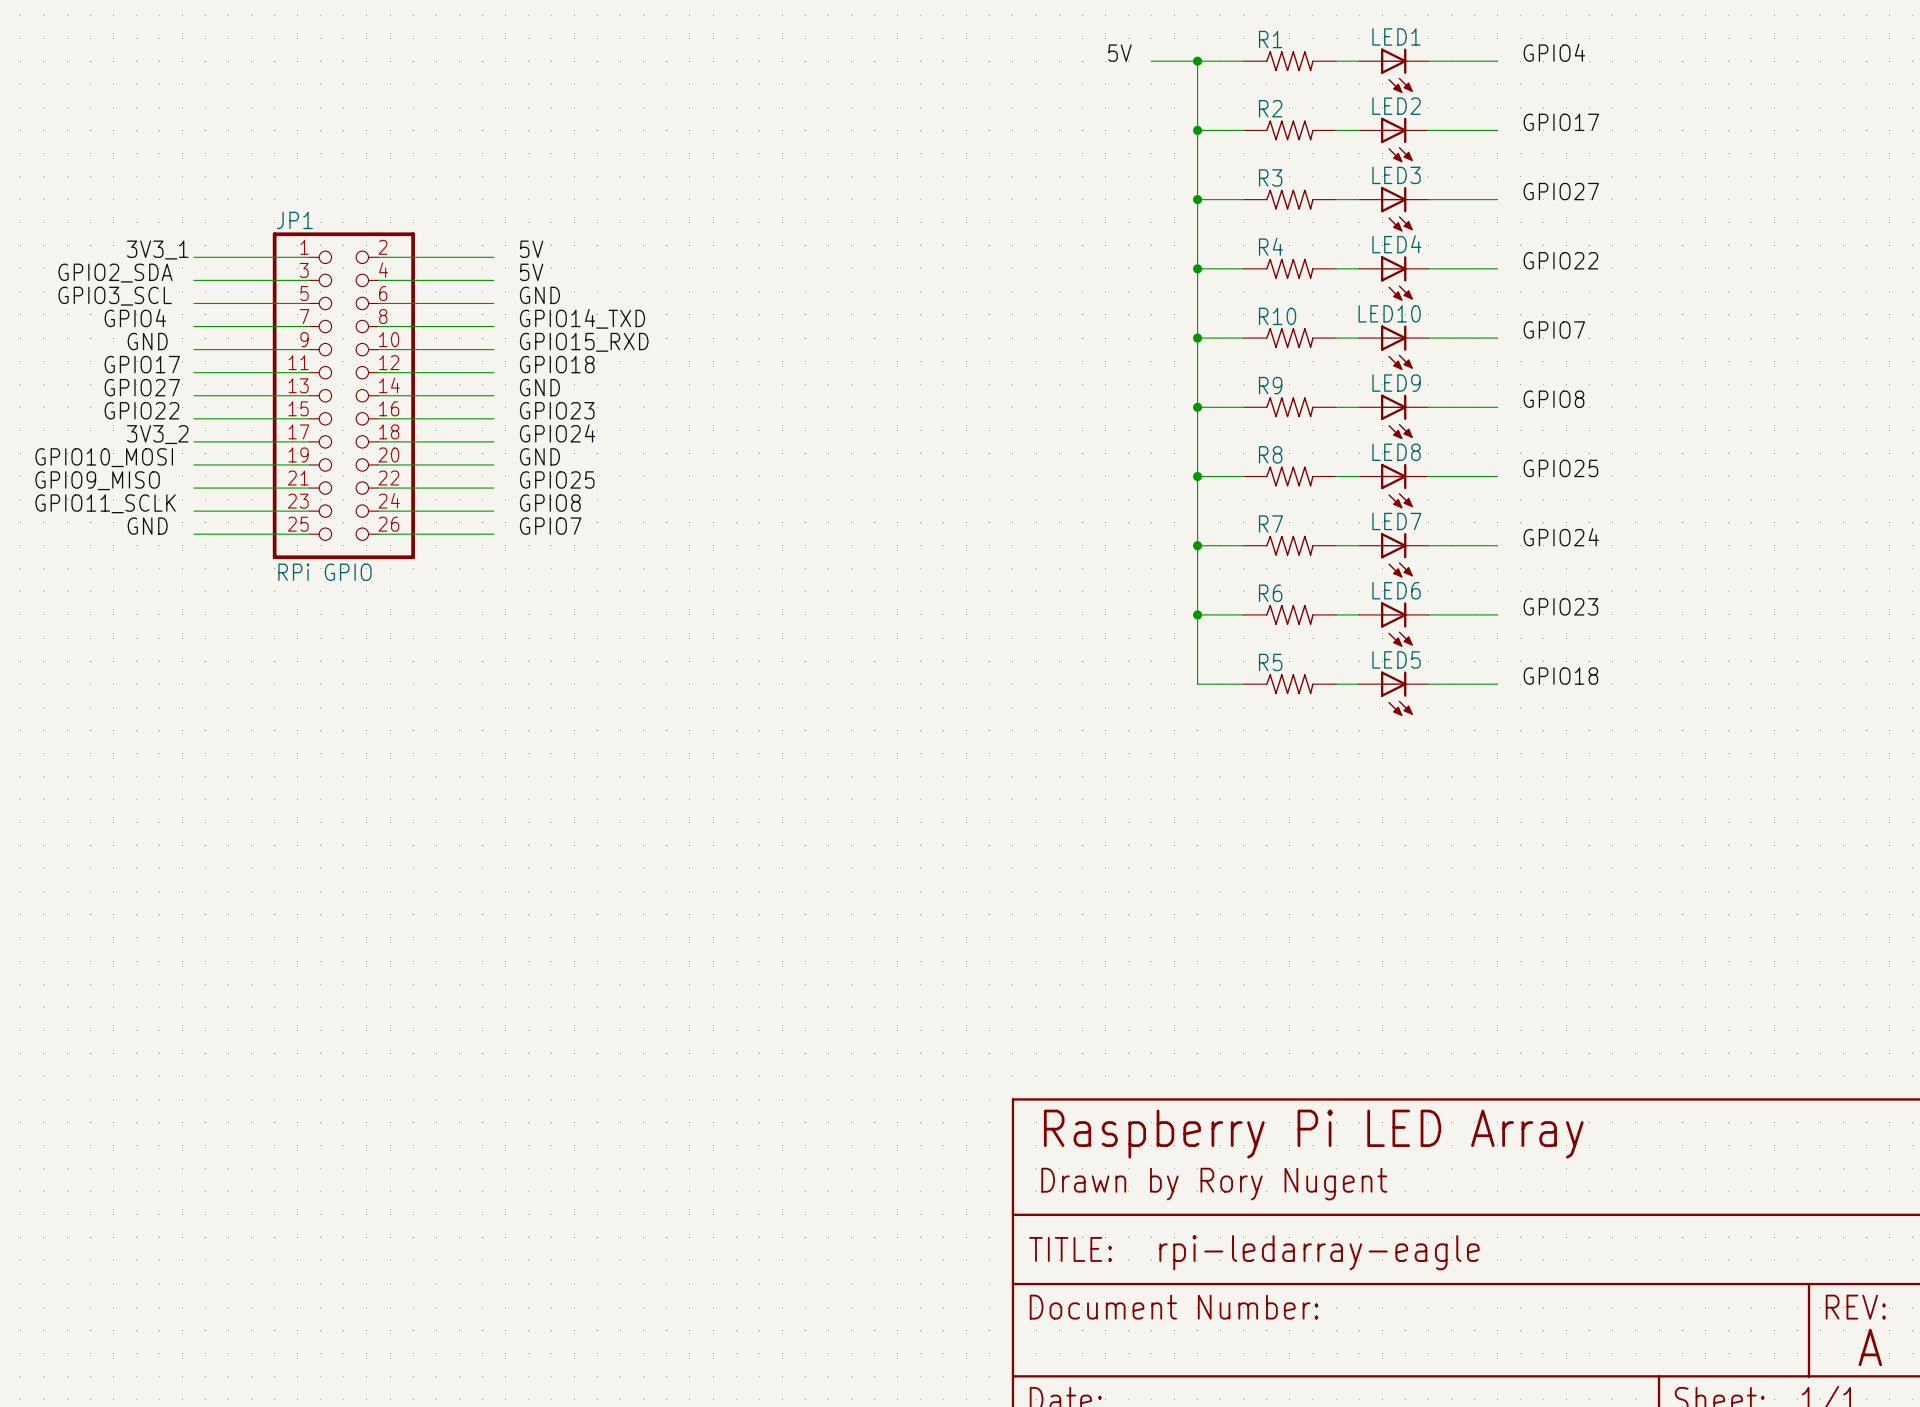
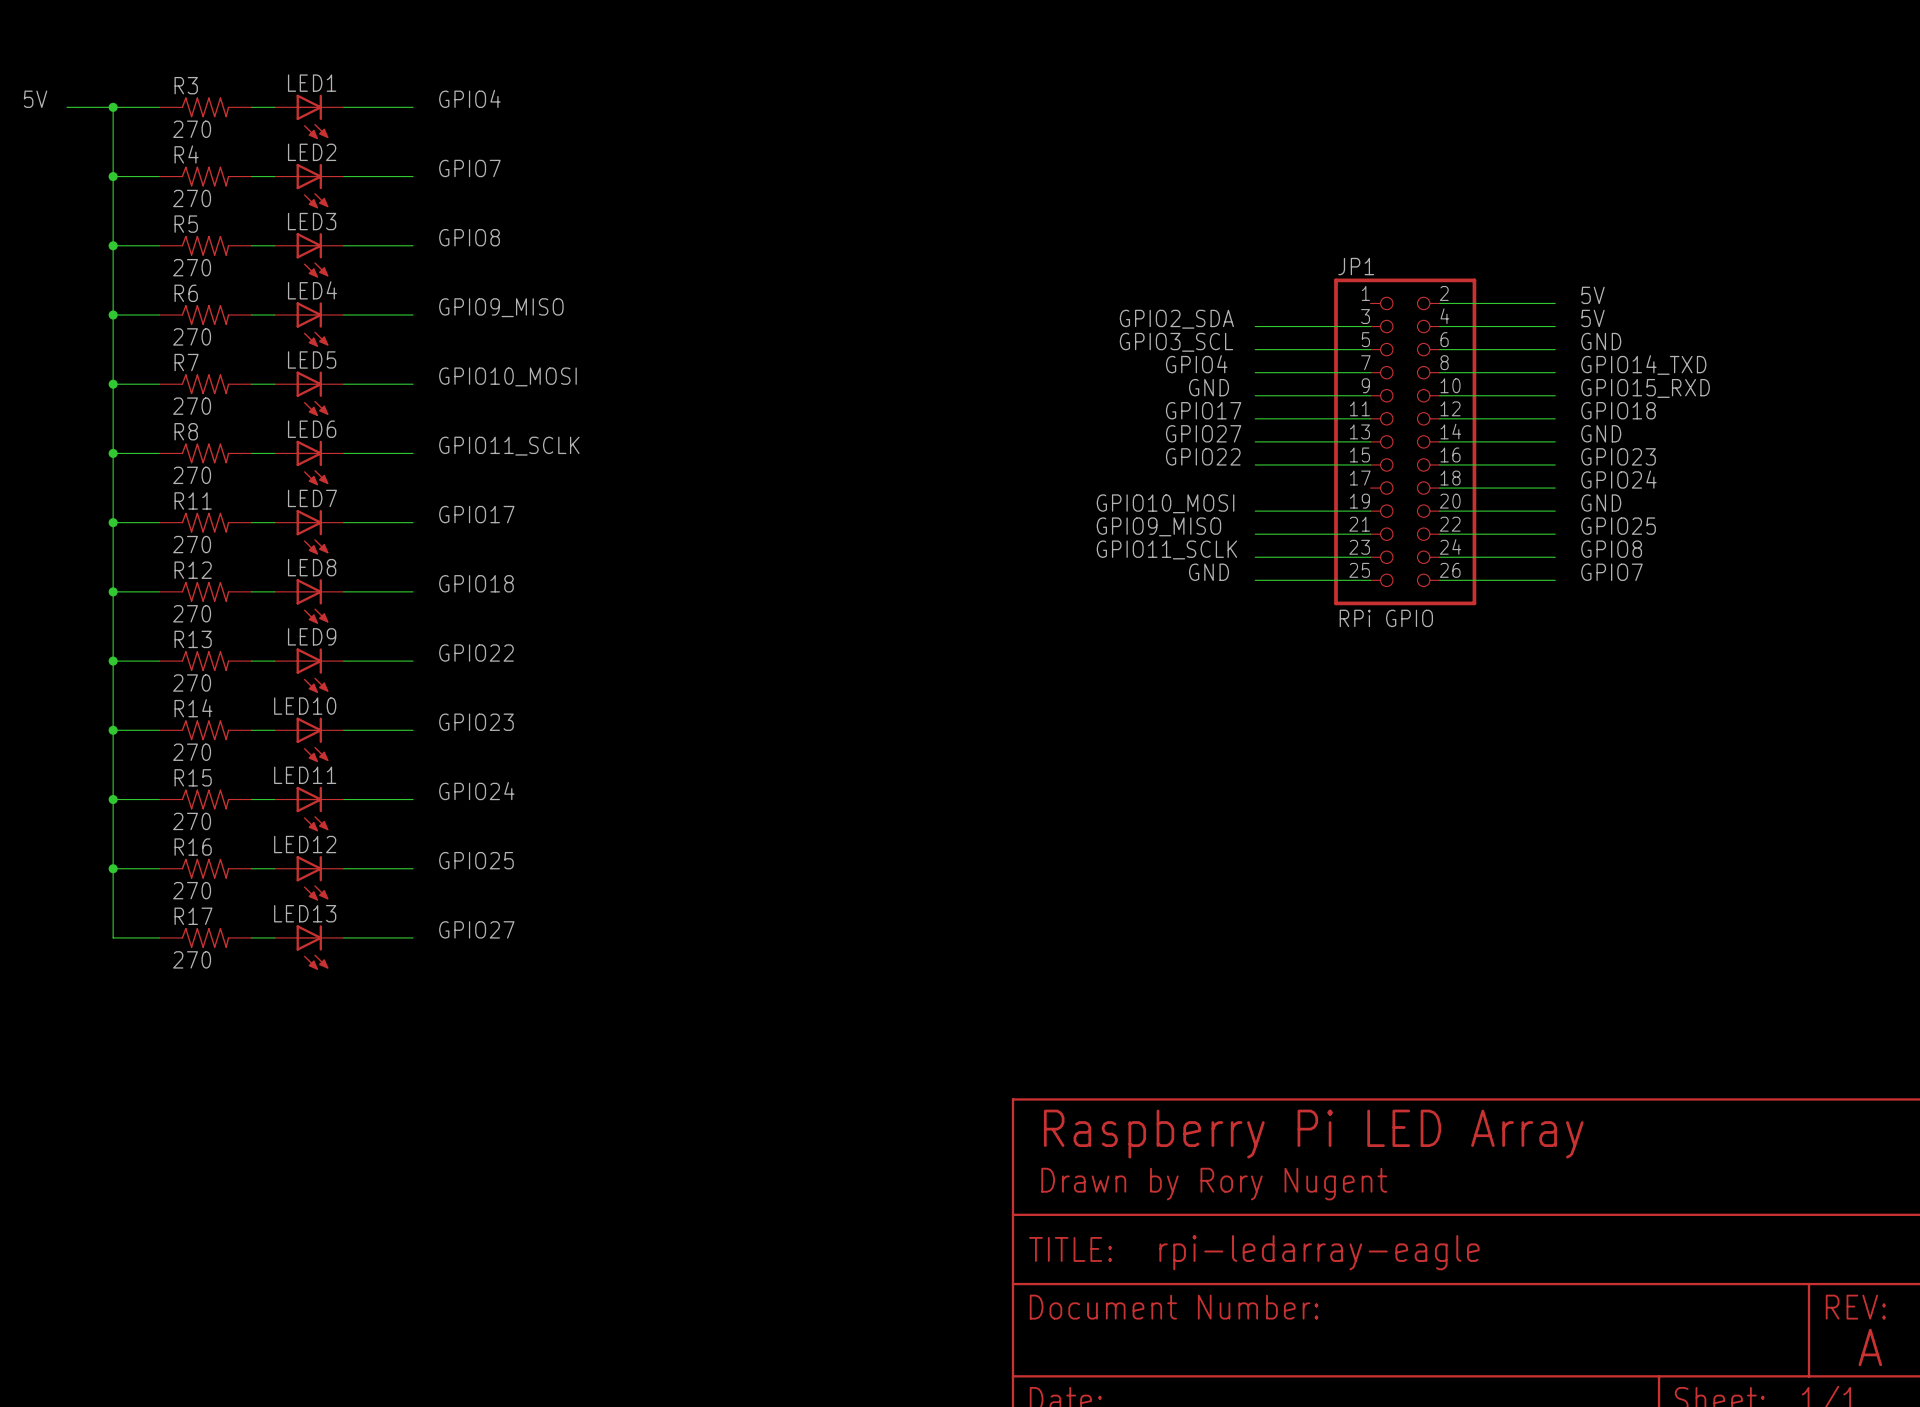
label: GPIO4 (1554, 52) -> none
label: 5V (1119, 53) -> none
wire: (1151, 61) (1243, 61) -> none
wire: (1197, 61) (1197, 684) (1243, 684) -> none
junction: (1197, 61) -> none
R1: (1289, 61) -> none
wire: (1336, 61) (1359, 61) -> none
wire: (1428, 61) (1497, 61) -> none
LED1 position: (1393, 70) -> (309, 116)
label: none -> GPIO4 (469, 98)
label: none -> 5V (35, 99)
wire: none -> (67, 107) (159, 107)
wire: none -> (113, 107) (113, 937) (159, 937)
junction: none -> (113, 107)
wire: none -> (251, 107) (274, 107)
wire: none -> (343, 107) (413, 107)
label: GPIO17 (1561, 122) -> none
R3 value: none -> 270 (192, 129)
wire: (1197, 130) (1243, 130) -> none
junction: (1197, 130) -> none
R2: (1289, 130) -> none
wire: (1336, 130) (1359, 130) -> none
wire: (1428, 130) (1497, 130) -> none
LED2 position: (1393, 139) -> (309, 186)
label: none -> GPIO7 (469, 168)
wire: none -> (113, 176) (159, 176)
junction: none -> (113, 176)
wire: none -> (251, 176) (274, 176)
wire: none -> (343, 176) (413, 176)
label: GPIO27 (1561, 191) -> none
R4 value: none -> 270 (192, 198)
wire: (1197, 199) (1243, 199) -> none
junction: (1197, 199) -> none
R3 position: (1289, 199) -> (205, 107)
wire: (1336, 199) (1359, 199) -> none
wire: (1428, 199) (1497, 199) -> none
LED3 position: (1393, 209) -> (309, 255)
label: none -> GPIO8 (469, 237)
wire: none -> (113, 245) (159, 245)
junction: none -> (113, 245)
wire: none -> (251, 245) (274, 245)
wire: none -> (343, 245) (413, 245)
label: 5V (531, 249) -> none
label: 3V3_1 (157, 250) -> none
wire: (193, 257) (309, 257) -> none
wire: (378, 257) (493, 257) -> none
label: GPIO22 (1560, 260) -> none
R5 value: none -> 270 (192, 267)
wire: (1197, 268) (1243, 268) -> none
junction: (1197, 268) -> none
R4 position: (1289, 268) -> (205, 176)
wire: (1336, 268) (1359, 268) -> none
wire: (1428, 268) (1497, 268) -> none
label: 5V (531, 272) -> none
label: GPIO2_SDA (115, 273) -> none
LED4 position: (1393, 278) -> (309, 324)
wire: (193, 280) (309, 280) -> none
wire: (378, 280) (493, 280) -> none
label: GND (539, 295) -> none
label: none -> 5V (1592, 295)
label: GPIO3_SCL (115, 296) -> none
wire: (193, 303) (309, 303) -> none
wire: (378, 303) (493, 303) -> none
wire: none -> (1439, 303) (1555, 303)
label: none -> GPIO9_MISO (501, 307)
wire: none -> (113, 314) (159, 314)
junction: none -> (113, 314)
wire: none -> (251, 314) (274, 314)
wire: none -> (343, 314) (413, 314)
label: GPIO4 (135, 318) -> none
label: GPIO14_TXD (582, 318) -> none
label: none -> 5V (1592, 318)
label: none -> GPIO2_SDA (1176, 319)
wire: (193, 326) (309, 326) -> none
wire: (378, 326) (493, 326) -> none
wire: none -> (1255, 326) (1370, 326)
wire: none -> (1439, 326) (1555, 326)
label: GPIO7 (1554, 329) -> none
R6 value: none -> 270 (192, 336)
wire: (1197, 338) (1243, 338) -> none
junction: (1197, 338) -> none
R10: (1289, 338) -> none
wire: (1336, 338) (1359, 338) -> none
wire: (1428, 338) (1497, 338) -> none
label: GND (147, 341) -> none
label: none -> GND (1601, 341)
label: GPIO15_RXD (584, 342) -> none
label: none -> GPIO3_SCL (1176, 342)
LED10 position: (1393, 347) -> (309, 739)
wire: (193, 349) (309, 349) -> none
wire: (378, 349) (493, 349) -> none
wire: none -> (1255, 349) (1370, 349)
wire: none -> (1439, 349) (1555, 349)
label: GPIO17 (142, 364) -> none
label: GPIO18 (557, 364) -> none
label: none -> GPIO4 (1196, 364)
label: none -> GPIO14_TXD (1643, 364)
wire: (193, 372) (309, 372) -> none
wire: (378, 372) (493, 372) -> none
wire: none -> (1255, 372) (1370, 372)
wire: none -> (1439, 372) (1555, 372)
label: none -> GPIO10_MOSI (507, 376)
wire: none -> (113, 384) (159, 384)
junction: none -> (113, 384)
wire: none -> (251, 384) (274, 384)
wire: none -> (343, 384) (413, 384)
label: GPIO27 (142, 387) -> none
label: GND (539, 387) -> none
label: none -> GND (1209, 387)
label: none -> GPIO15_RXD (1645, 388)
wire: (193, 395) (309, 395) -> none
JP1 position: (343, 395) -> (1405, 441)
wire: (378, 395) (493, 395) -> none
wire: none -> (1255, 395) (1370, 395)
wire: none -> (1439, 395) (1555, 395)
label position: GPIO8 (1553, 399) -> GPIO8 (1611, 549)
R7 value: none -> 270 (192, 406)
wire: (1197, 407) (1243, 407) -> none
junction: (1197, 407) -> none
R9: (1289, 407) -> none
wire: (1336, 407) (1359, 407) -> none
wire: (1428, 407) (1497, 407) -> none
label: GPIO22 (141, 410) -> none
label: GPIO23 (557, 410) -> none
label: none -> GPIO17 (1203, 410)
label: none -> GPIO18 (1618, 410)
LED9 position: (1393, 416) -> (309, 670)
wire: (193, 418) (309, 418) -> none
wire: (378, 418) (493, 418) -> none
wire: none -> (1255, 418) (1370, 418)
wire: none -> (1439, 418) (1555, 418)
label: GPIO24 (557, 433) -> none
label: none -> GPIO27 (1203, 433)
label: none -> GND (1601, 433)
label: 3V3_2 (157, 434) -> none
wire: (193, 441) (309, 441) -> none
wire: (378, 441) (493, 441) -> none
wire: none -> (1255, 441) (1370, 441)
wire: none -> (1439, 441) (1555, 441)
label: none -> GPIO11_SCLK (509, 446)
wire: none -> (113, 453) (159, 453)
junction: none -> (113, 453)
wire: none -> (251, 453) (274, 453)
wire: none -> (343, 453) (413, 453)
label: GND (539, 456) -> none
label: none -> GPIO22 (1203, 456)
label: GPIO10_MOSI (104, 457) -> none
wire: (193, 464) (309, 464) -> none
wire: (378, 464) (493, 464) -> none
wire: none -> (1255, 464) (1370, 464)
wire: none -> (1439, 464) (1555, 464)
label position: GPIO25 (1560, 468) -> GPIO25 (1618, 526)
R8 value: none -> 270 (192, 475)
wire: (1197, 476) (1243, 476) -> none
junction: (1197, 476) -> none
R8 position: (1289, 476) -> (205, 453)
wire: (1336, 476) (1359, 476) -> none
wire: (1428, 476) (1497, 476) -> none
label: GPIO25 (557, 479) -> none
label: GPIO9_MISO (97, 480) -> none
LED8 position: (1393, 486) -> (309, 601)
wire: (193, 488) (309, 488) -> none
wire: (378, 488) (493, 488) -> none
wire: none -> (1439, 488) (1555, 488)
label: GPIO11_SCLK (105, 503) -> none
label: GPIO8 (550, 503) -> none
label: none -> GPIO10_MOSI (1165, 503)
label: none -> GND (1601, 503)
wire: (193, 511) (309, 511) -> none
wire: (378, 511) (493, 511) -> none
wire: none -> (1255, 511) (1370, 511)
wire: none -> (1439, 511) (1555, 511)
label: none -> GPIO17 (476, 514)
wire: none -> (113, 522) (159, 522)
junction: none -> (113, 522)
R11: none -> 270 (205, 522)
wire: none -> (251, 522) (274, 522)
wire: none -> (343, 522) (413, 522)
label: GND (147, 526) -> none
label: GPIO7 (550, 526) -> none
label: none -> GPIO9_MISO (1158, 526)
wire: (193, 534) (309, 534) -> none
wire: (378, 534) (493, 534) -> none
wire: none -> (1255, 534) (1370, 534)
wire: none -> (1439, 534) (1555, 534)
label position: GPIO24 (1561, 537) -> GPIO24 (1618, 479)
wire: (1197, 545) (1243, 545) -> none
junction: (1197, 545) -> none
R7 position: (1289, 545) -> (205, 384)
wire: (1336, 545) (1359, 545) -> none
wire: (1428, 545) (1497, 545) -> none
label: none -> GPIO11_SCLK (1166, 549)
LED7 position: (1393, 555) -> (309, 532)
wire: none -> (1255, 557) (1370, 557)
wire: none -> (1439, 557) (1555, 557)
label: none -> GND (1209, 572)
label: none -> GPIO7 (1611, 572)
wire: none -> (1255, 580) (1370, 580)
wire: none -> (1439, 580) (1555, 580)
label: none -> GPIO18 (476, 583)
wire: none -> (113, 591) (159, 591)
junction: none -> (113, 591)
R12: none -> 270 (205, 591)
wire: none -> (251, 591) (274, 591)
wire: none -> (343, 591) (413, 591)
label position: GPIO23 (1560, 606) -> GPIO23 (1618, 456)
wire: (1197, 614) (1243, 614) -> none
junction: (1197, 614) -> none
R6 position: (1289, 614) -> (205, 314)
wire: (1336, 614) (1359, 614) -> none
wire: (1428, 614) (1497, 614) -> none
LED6 position: (1393, 624) -> (309, 463)
label: none -> GPIO22 (476, 653)
wire: none -> (113, 661) (159, 661)
junction: none -> (113, 661)
R13: none -> 270 (205, 661)
wire: none -> (251, 661) (274, 661)
wire: none -> (343, 661) (413, 661)
label: GPIO18 (1560, 676) -> none
R5 position: (1289, 684) -> (205, 245)
wire: (1336, 684) (1359, 684) -> none
wire: (1428, 684) (1497, 684) -> none
LED5 position: (1393, 693) -> (309, 393)
label: none -> GPIO23 (476, 722)
wire: none -> (113, 730) (159, 730)
junction: none -> (113, 730)
R14: none -> 270 (205, 730)
wire: none -> (251, 730) (274, 730)
wire: none -> (343, 730) (413, 730)
label: none -> GPIO24 (476, 791)
wire: none -> (113, 799) (159, 799)
junction: none -> (113, 799)
R15: none -> 270 (205, 799)
wire: none -> (251, 799) (274, 799)
wire: none -> (343, 799) (413, 799)
LED11: none -> (309, 809)
label: none -> GPIO25 (476, 860)
wire: none -> (113, 868) (159, 868)
junction: none -> (113, 868)
R16: none -> 270 (205, 868)
wire: none -> (251, 868) (274, 868)
wire: none -> (343, 868) (413, 868)
LED12: none -> (309, 878)
label: none -> GPIO27 (476, 929)
R17: none -> 270 (205, 937)
wire: none -> (251, 937) (274, 937)
wire: none -> (343, 937) (413, 937)
LED13: none -> (309, 947)

